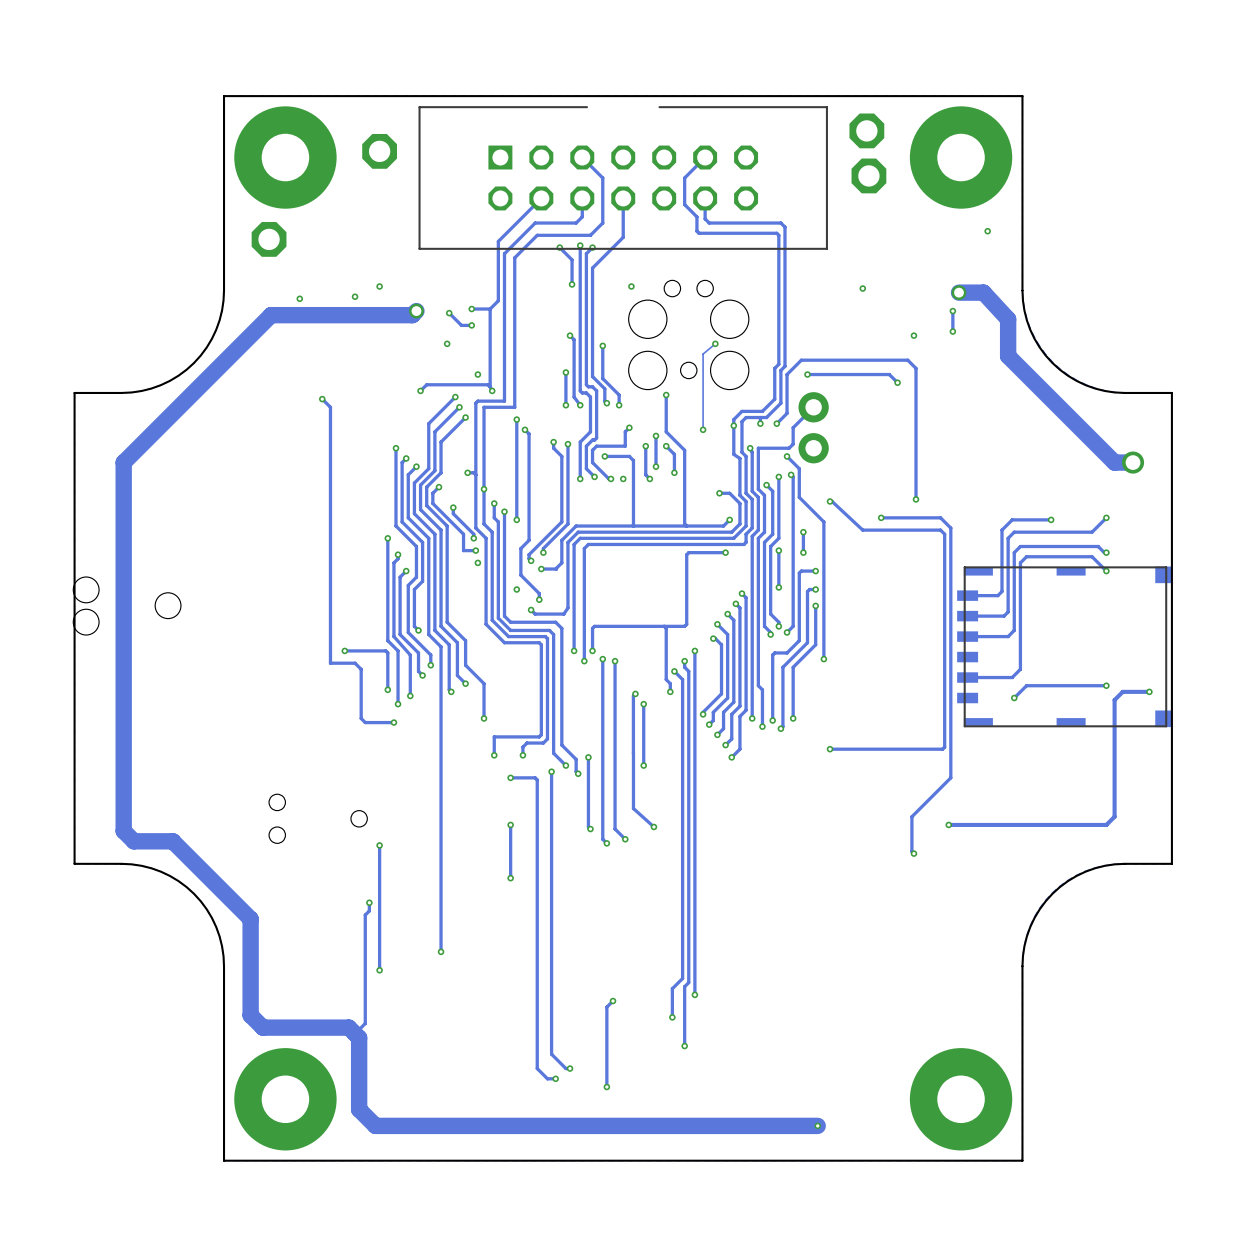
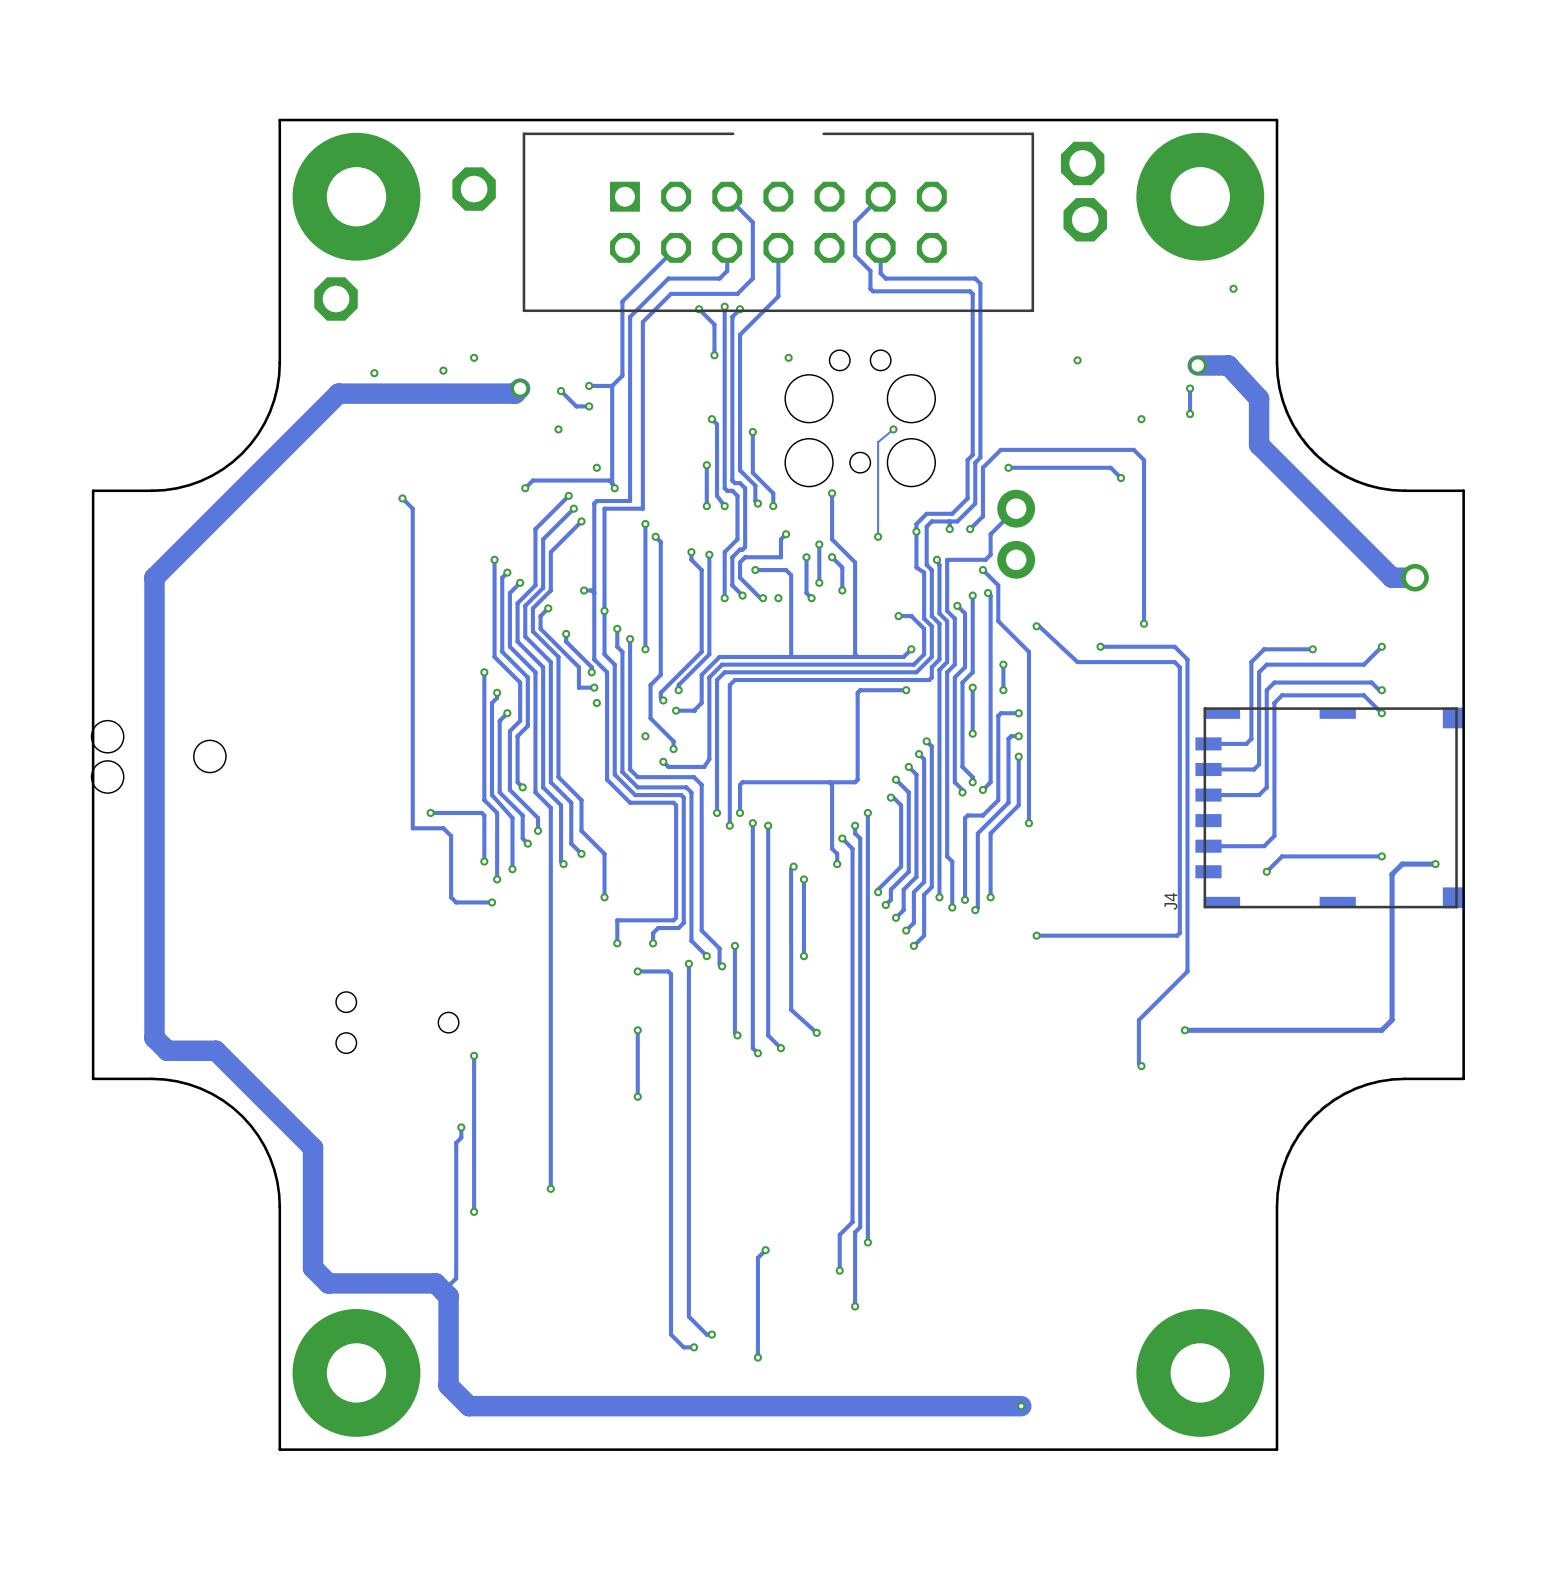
J4 name: none -> J4 (1170, 901)

